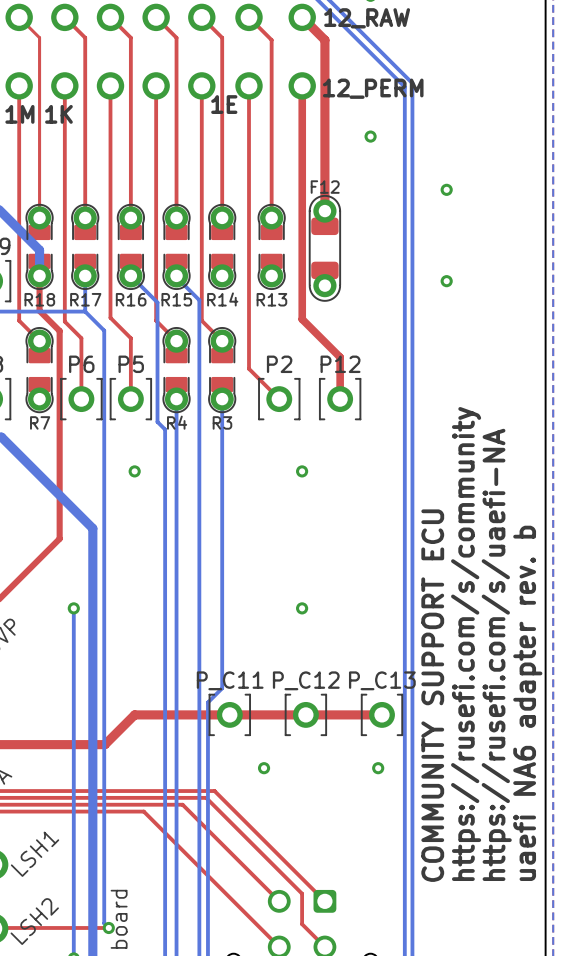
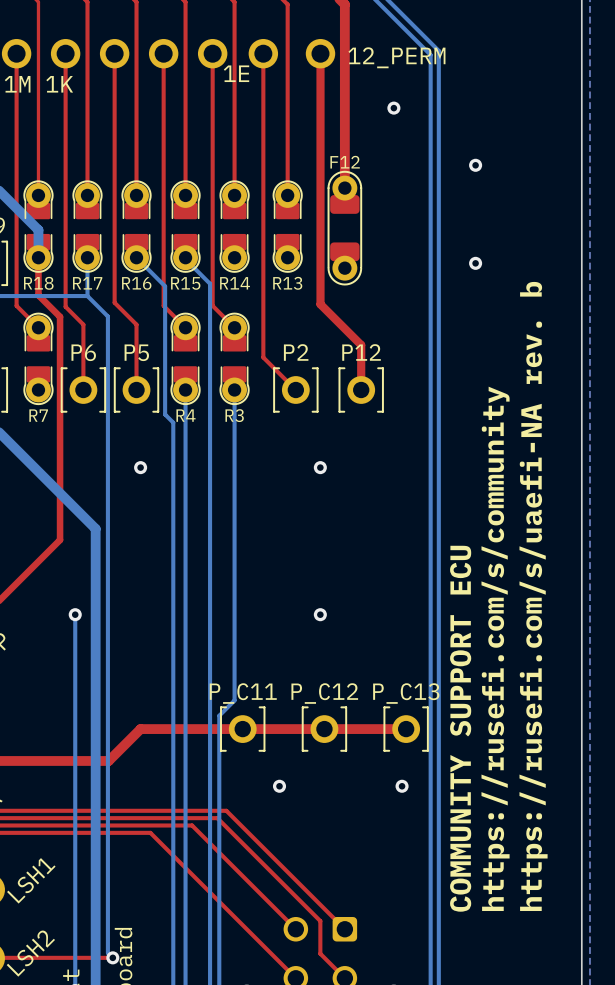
text: https://rusefi.com/s/uaefi-NA (496, 654) -> https://rusefi.com/s/uaefi-NA rev. b (533, 596)
text: uaefi NA6 adapter rev. b (527, 703) -> none

